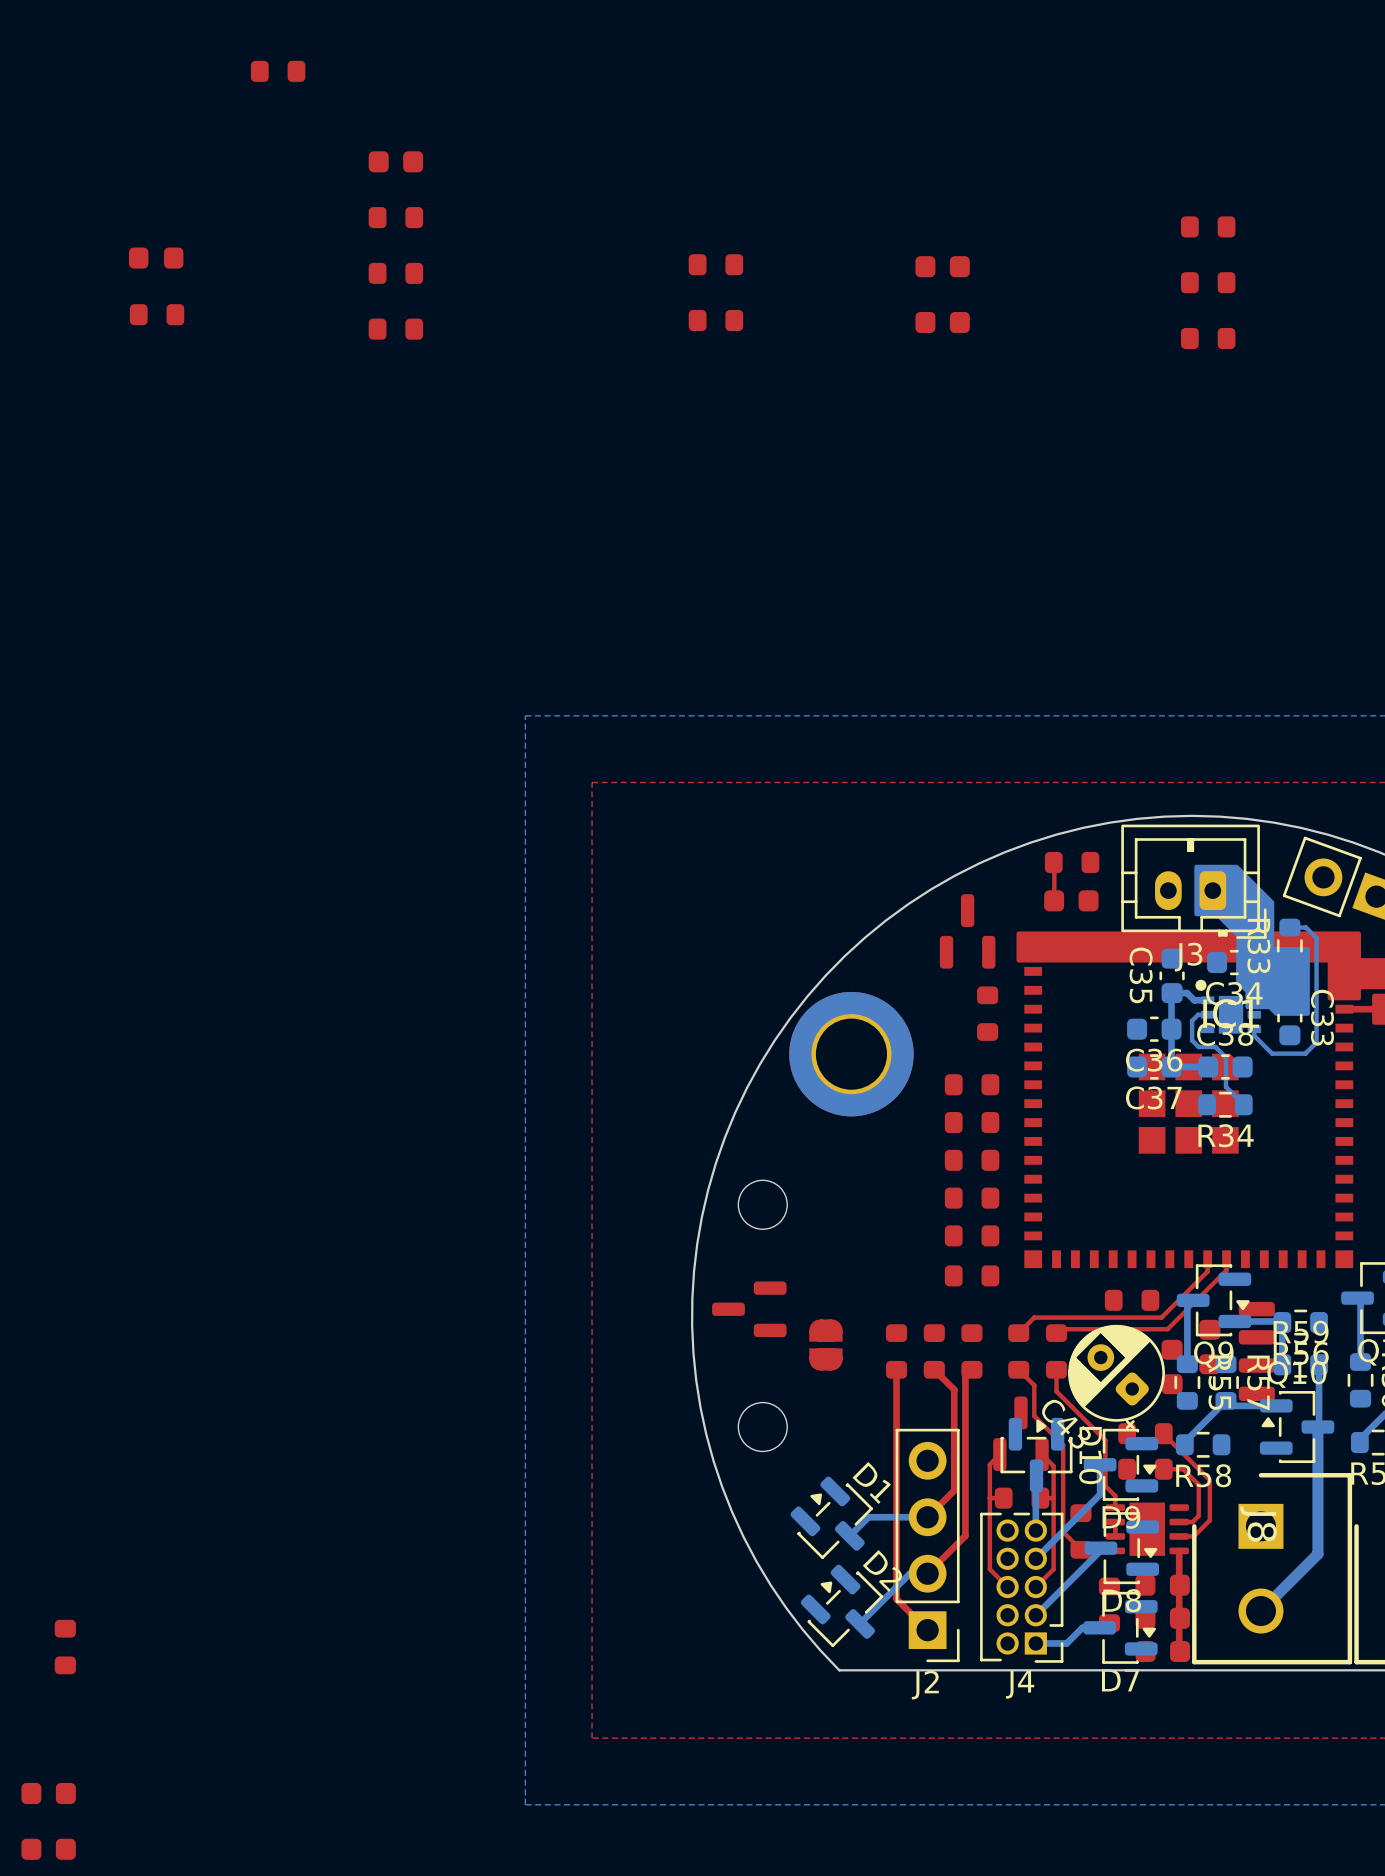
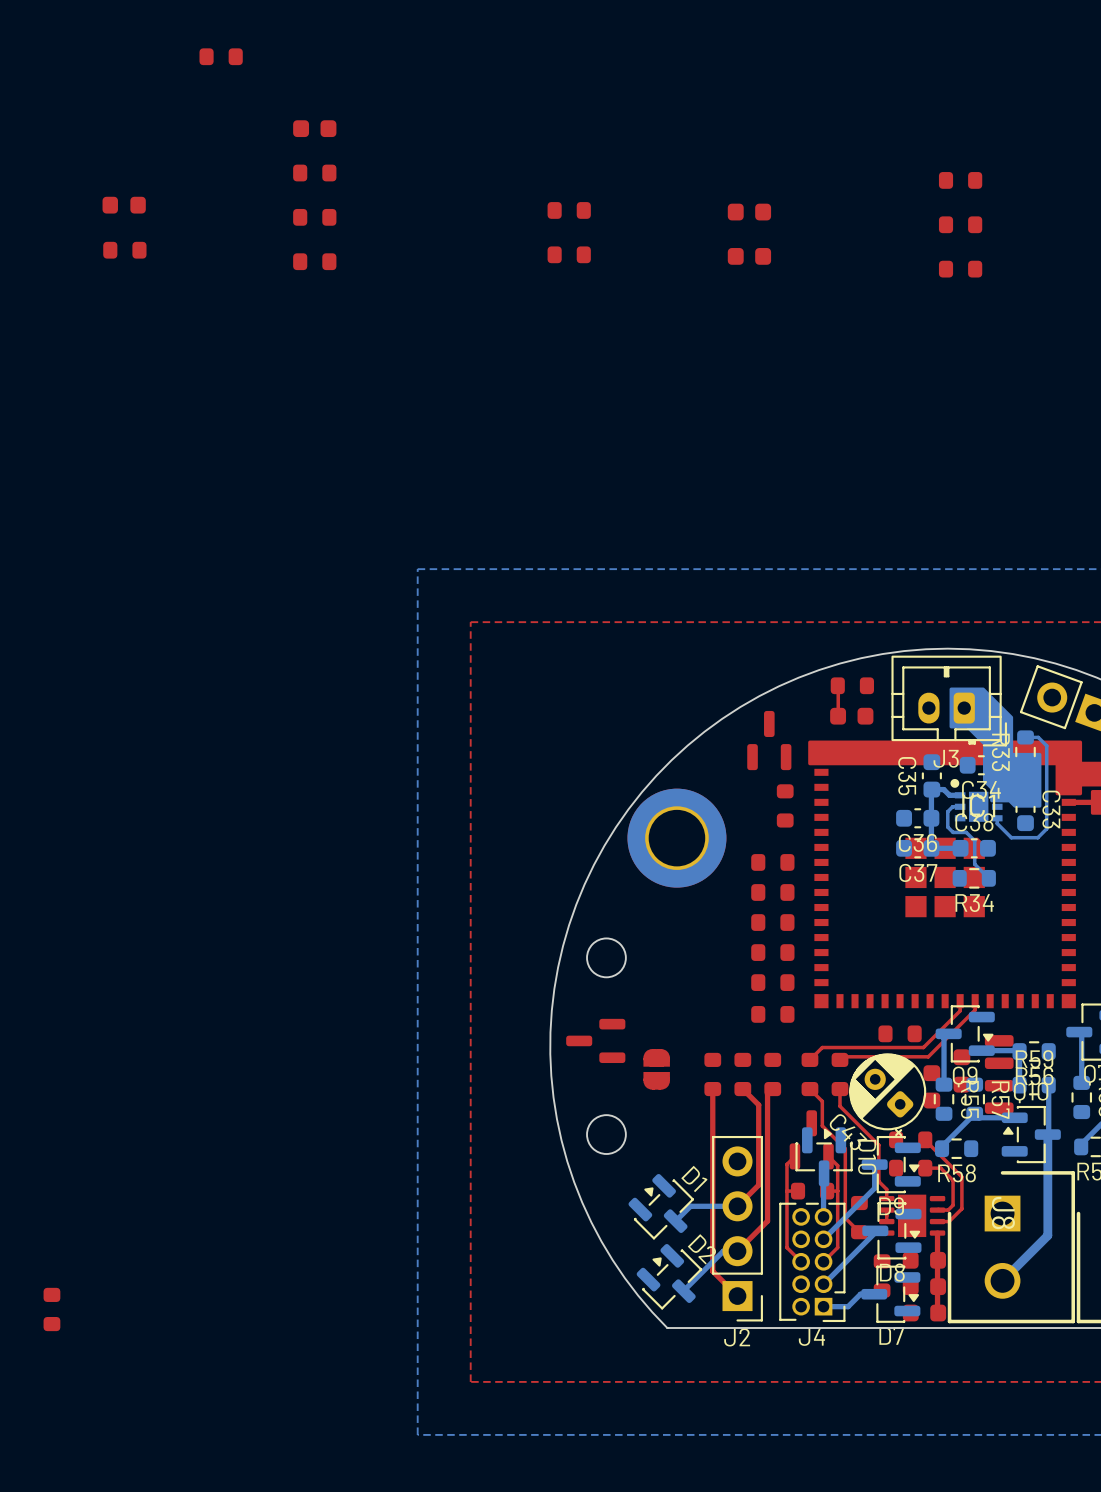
part: (48, 1793) -> none
part: (48, 1849) -> none

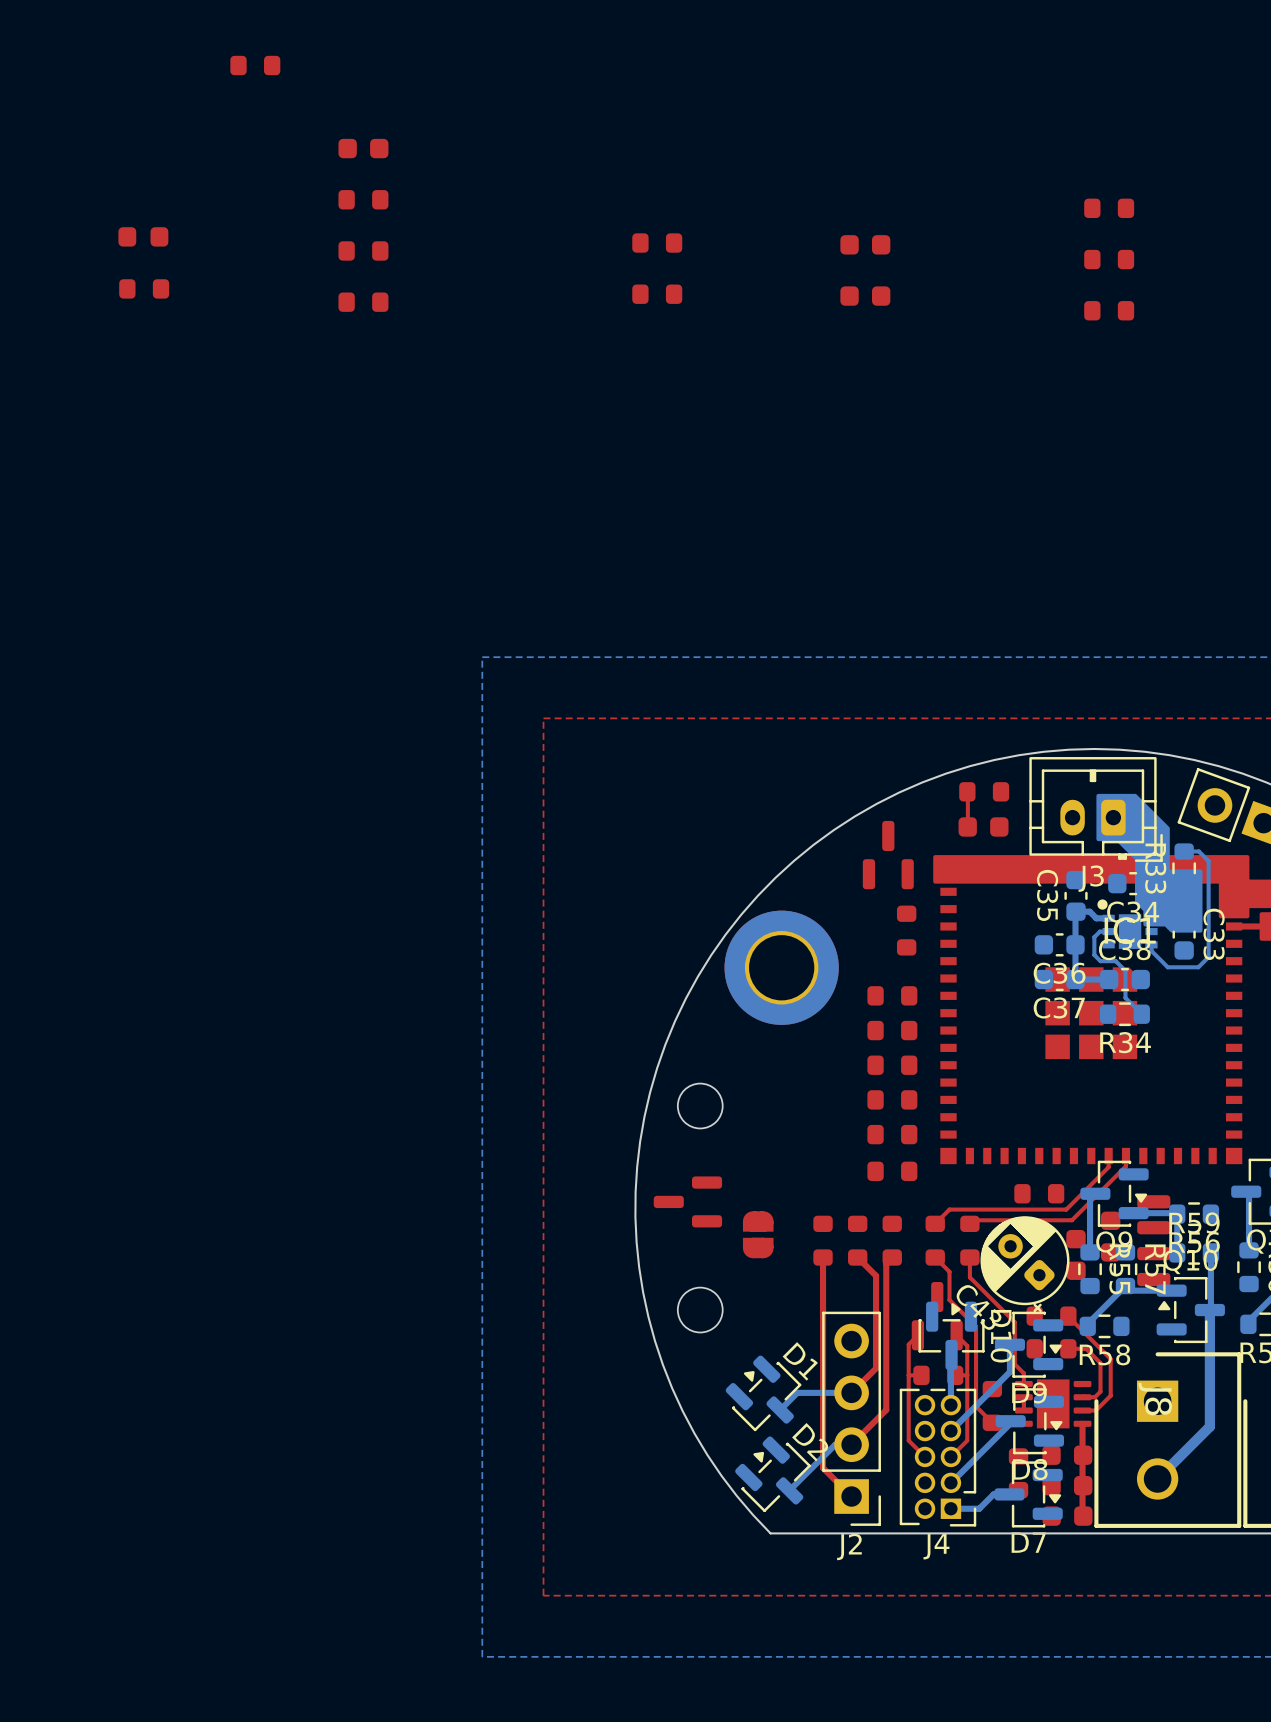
part: (51, 1309) -> none

